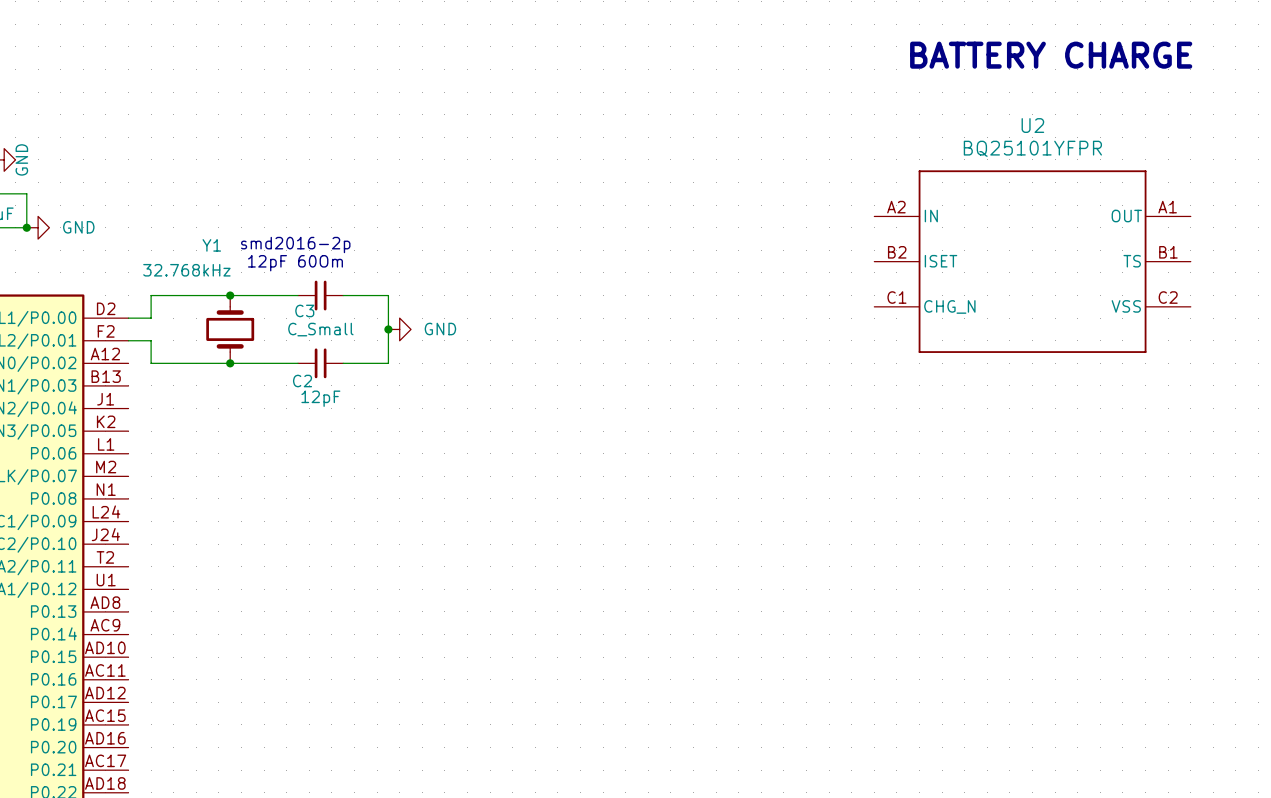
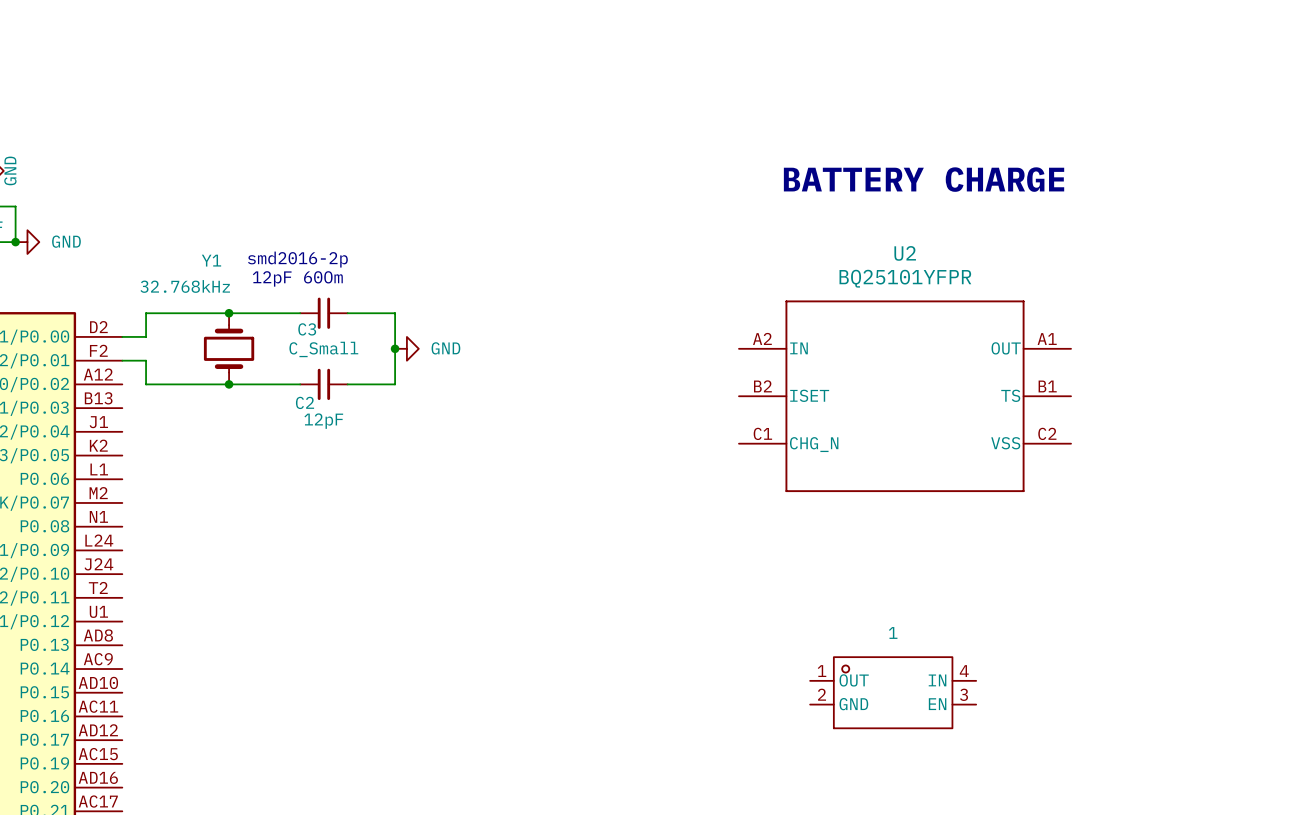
text position: BATTERY CHARGE (1051, 55) -> BATTERY CHARGE (924, 179)
U2 position: (1032, 261) -> (905, 396)
1: none -> (893, 692)

